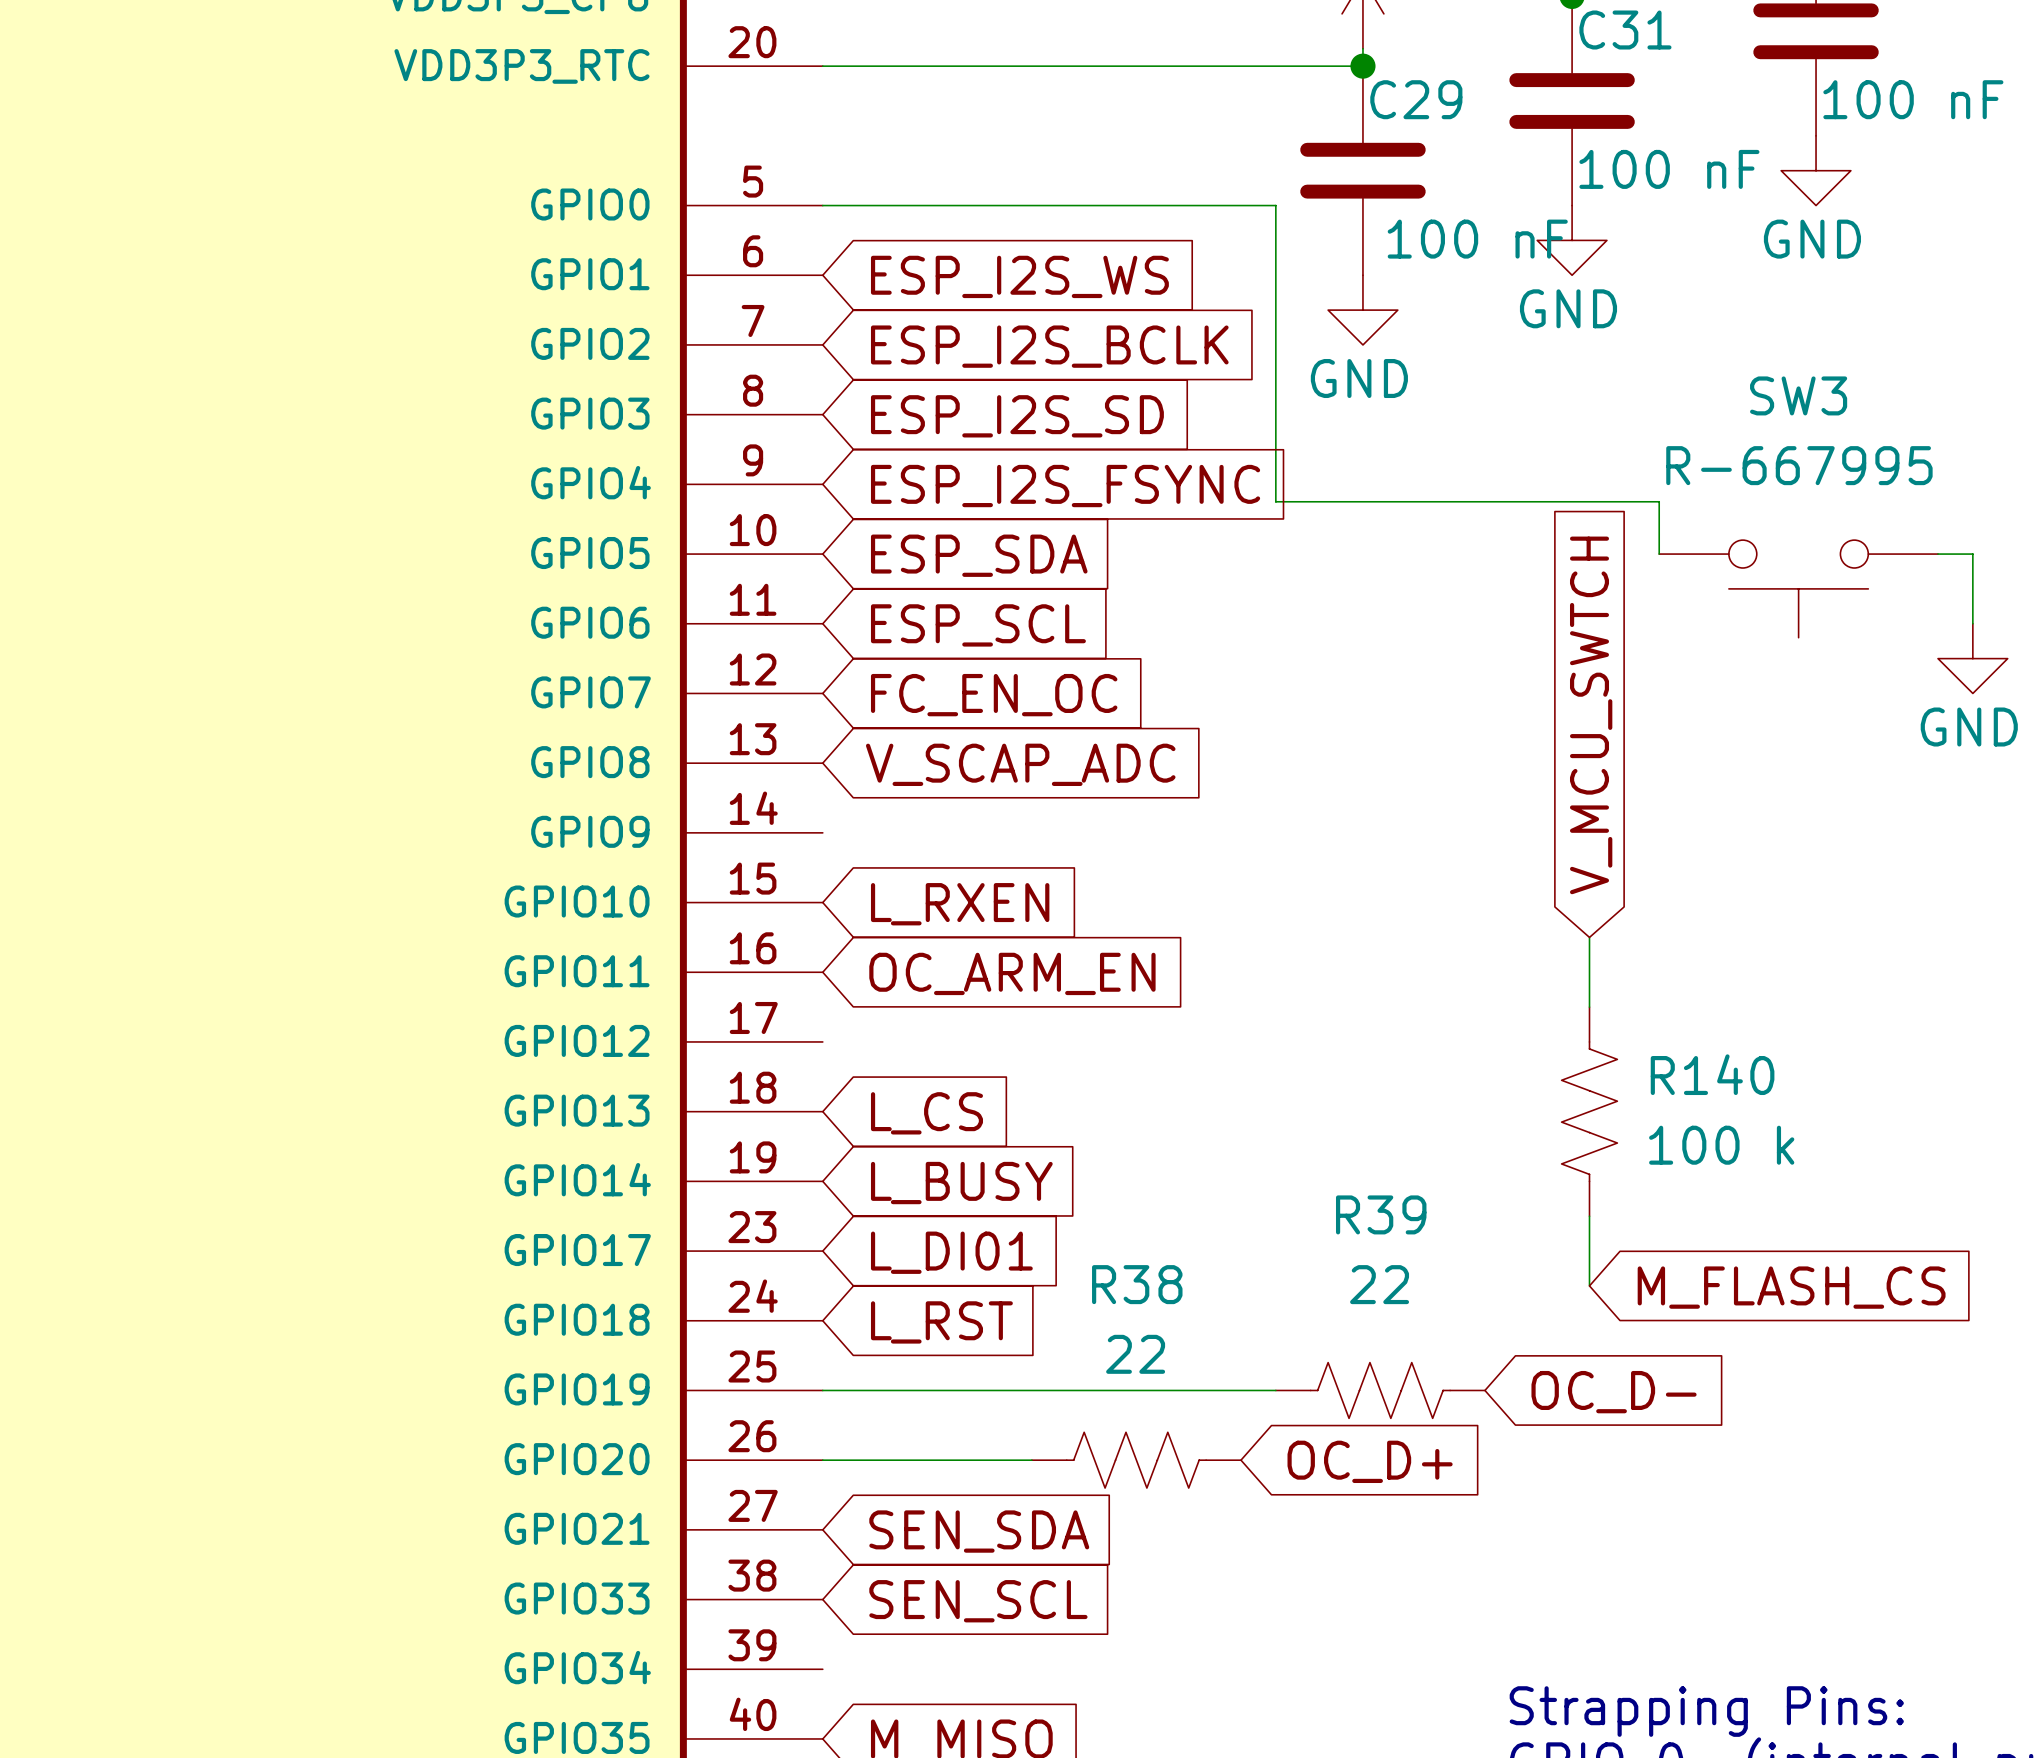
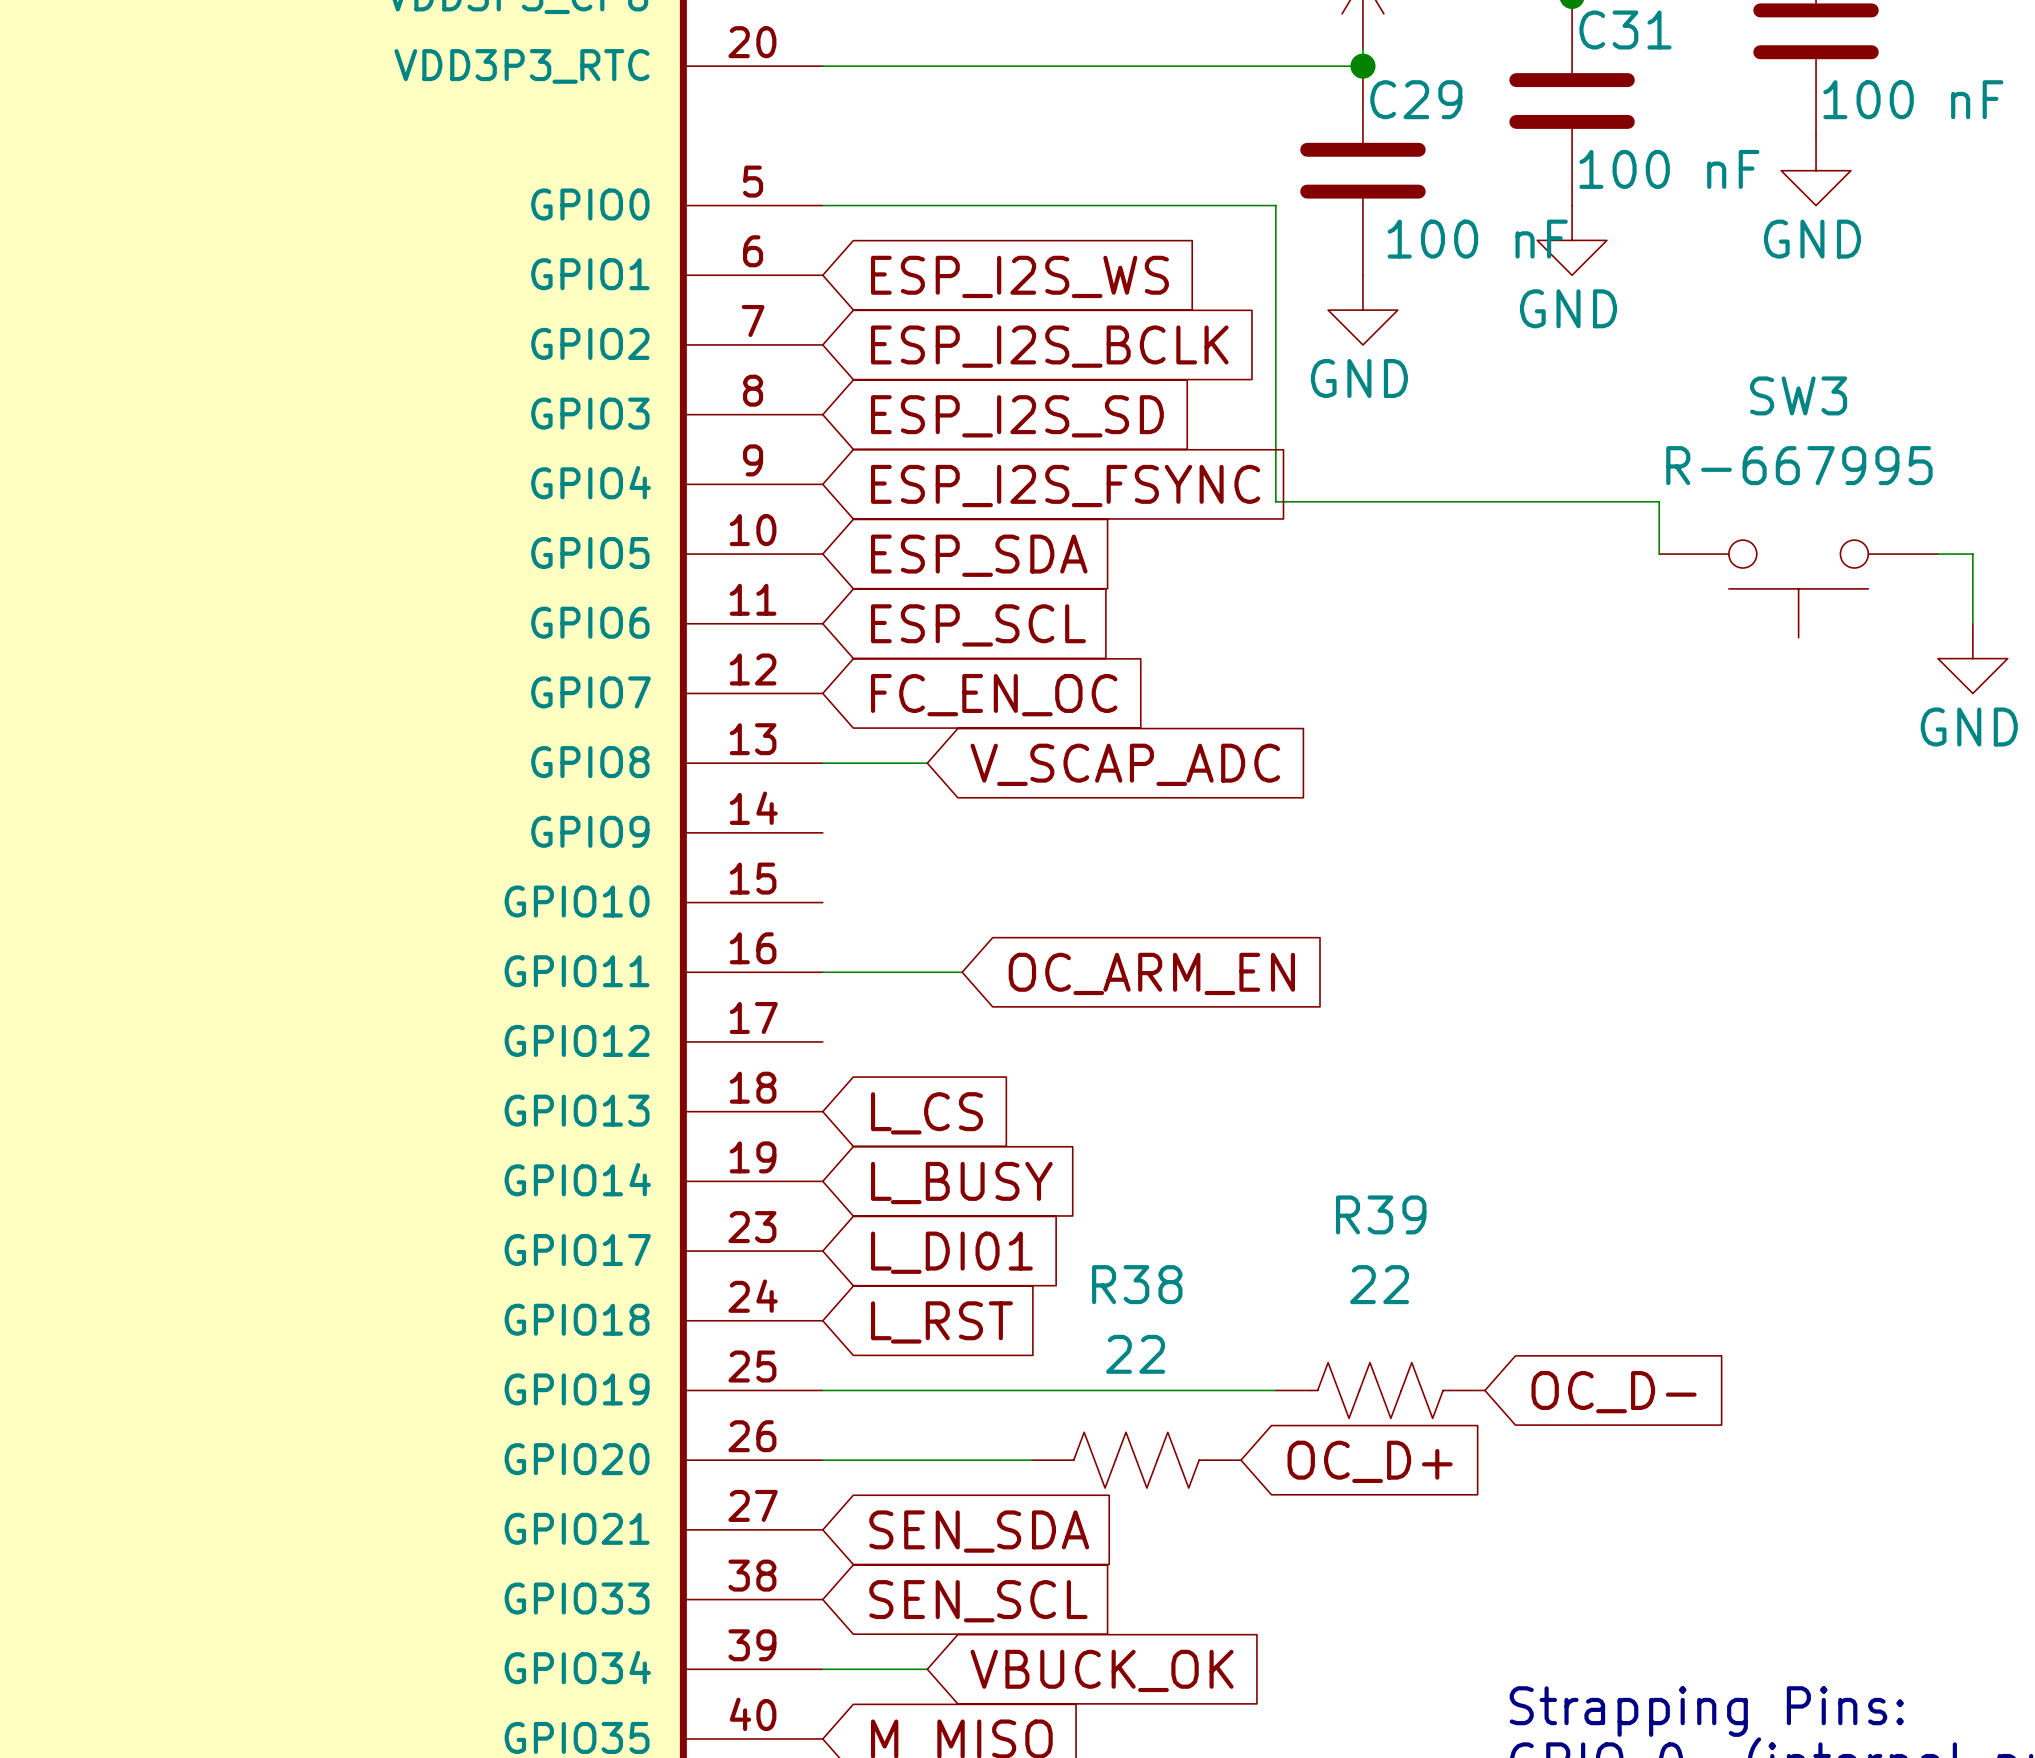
global label: V_MCU_SWTCH (1591, 715) -> none
wire: none -> (822, 763) (927, 763)
global label position: V_SCAP_ADC (1020, 764) -> V_SCAP_ADC (1125, 764)
global label: L_RXEN (960, 904) -> none
wire: (1589, 937) (1589, 1007) -> none
wire: none -> (822, 972) (962, 972)
global label position: OC_ARM_EN (1012, 973) -> OC_ARM_EN (1151, 973)
R140: 100 k (1589, 1111) -> none
wire: (1589, 1216) (1589, 1285) -> none
global label: M_FLASH_CS (1791, 1287) -> none
wire: none -> (822, 1669) (927, 1669)
global label: none -> VBUCK_OK (1102, 1670)

